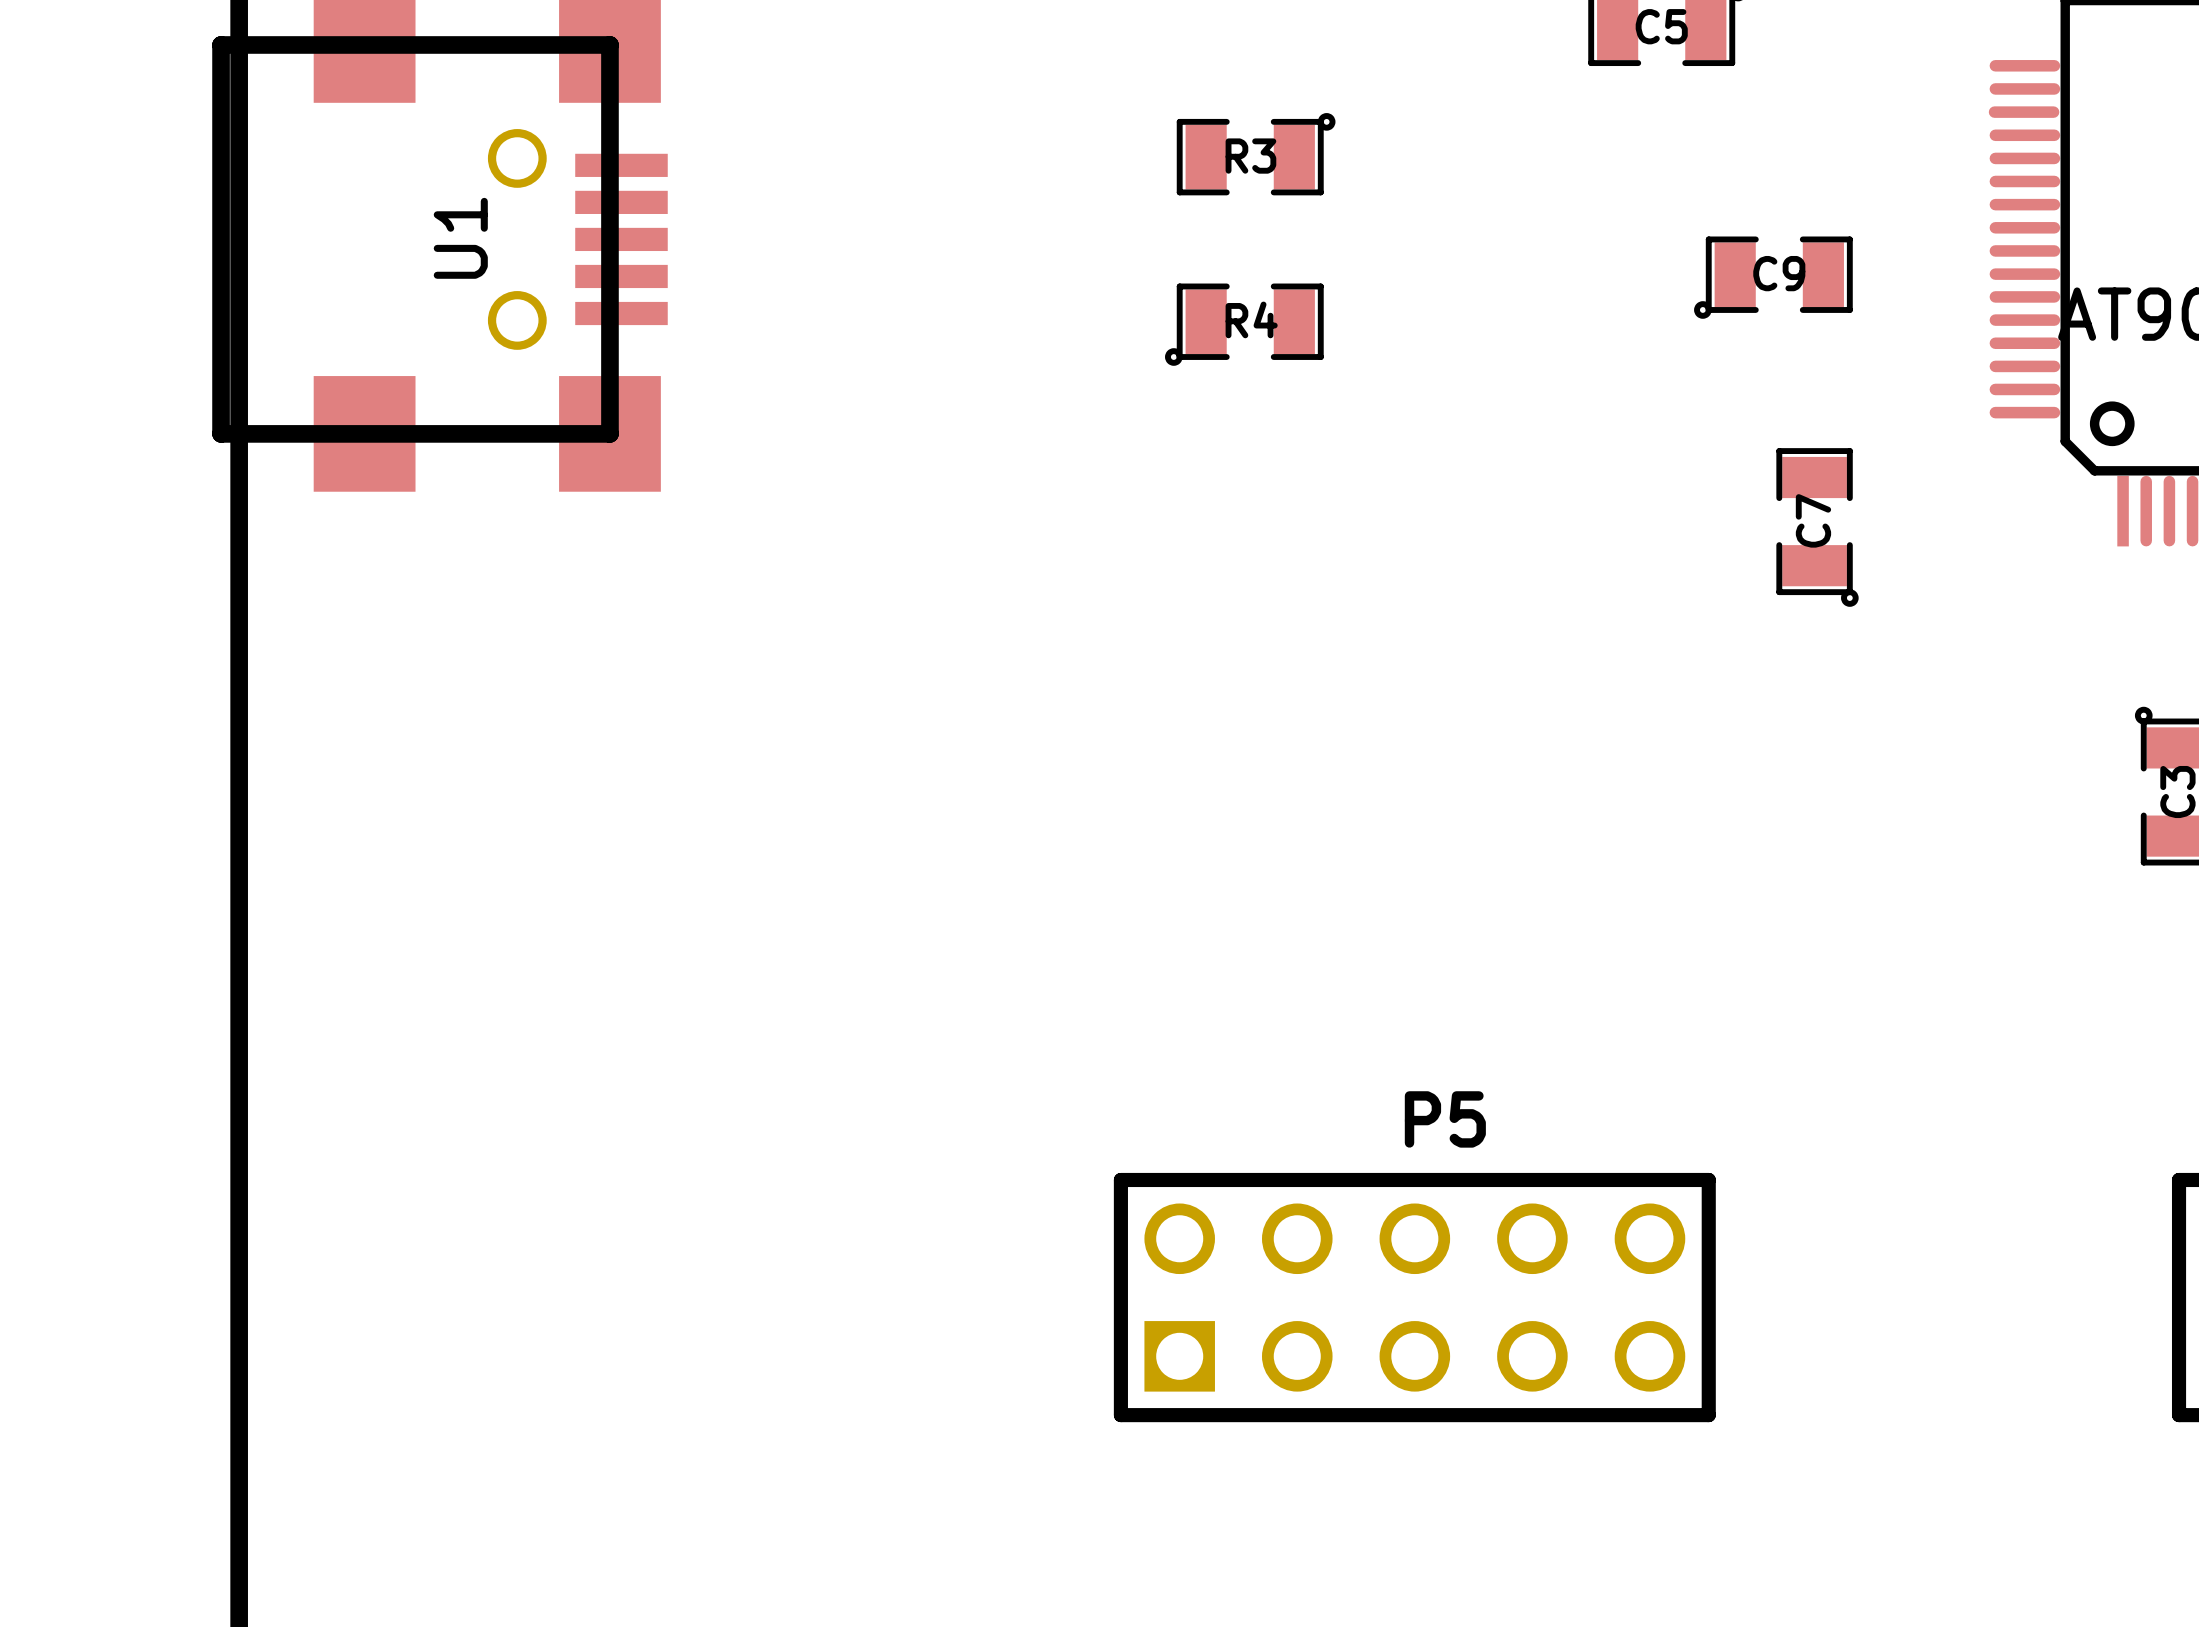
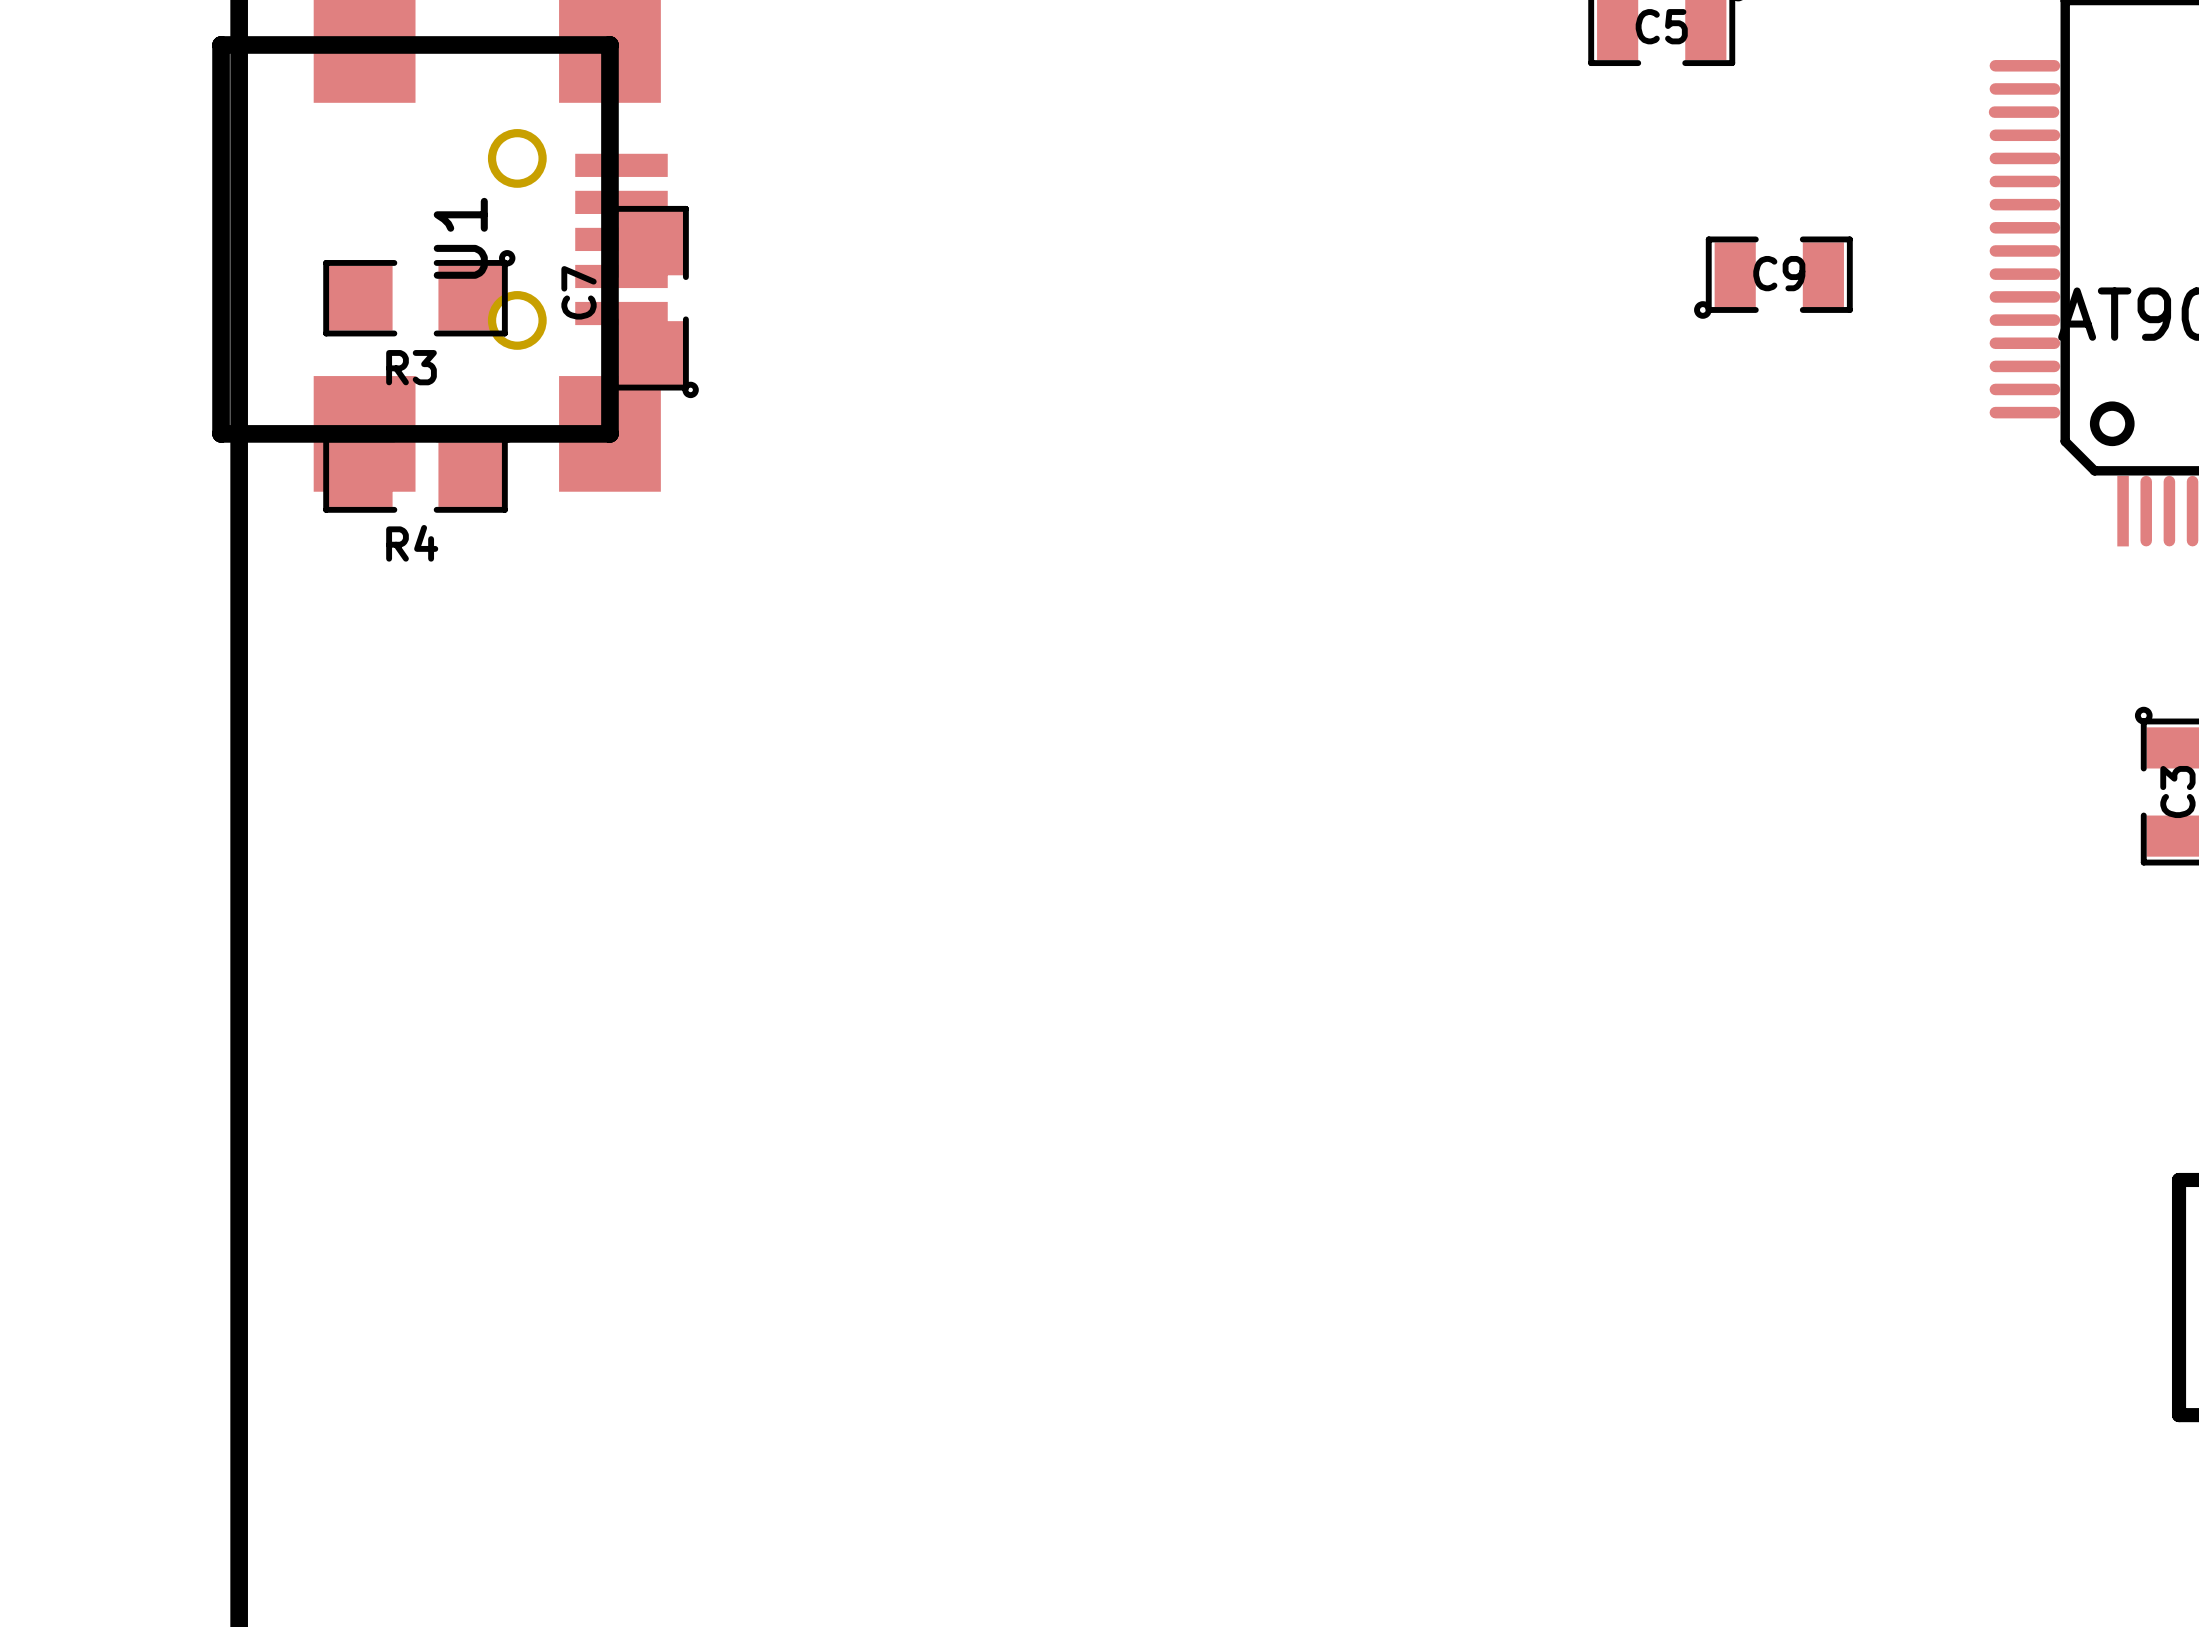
R3 footprint: [1176, 113, 1336, 196] -> [323, 250, 516, 337]
R4 footprint: [1165, 283, 1324, 366] -> [323, 426, 516, 513]
C7 footprint: [1776, 448, 1859, 607] -> [612, 205, 699, 399]
P5: (1414, 1297) -> none

